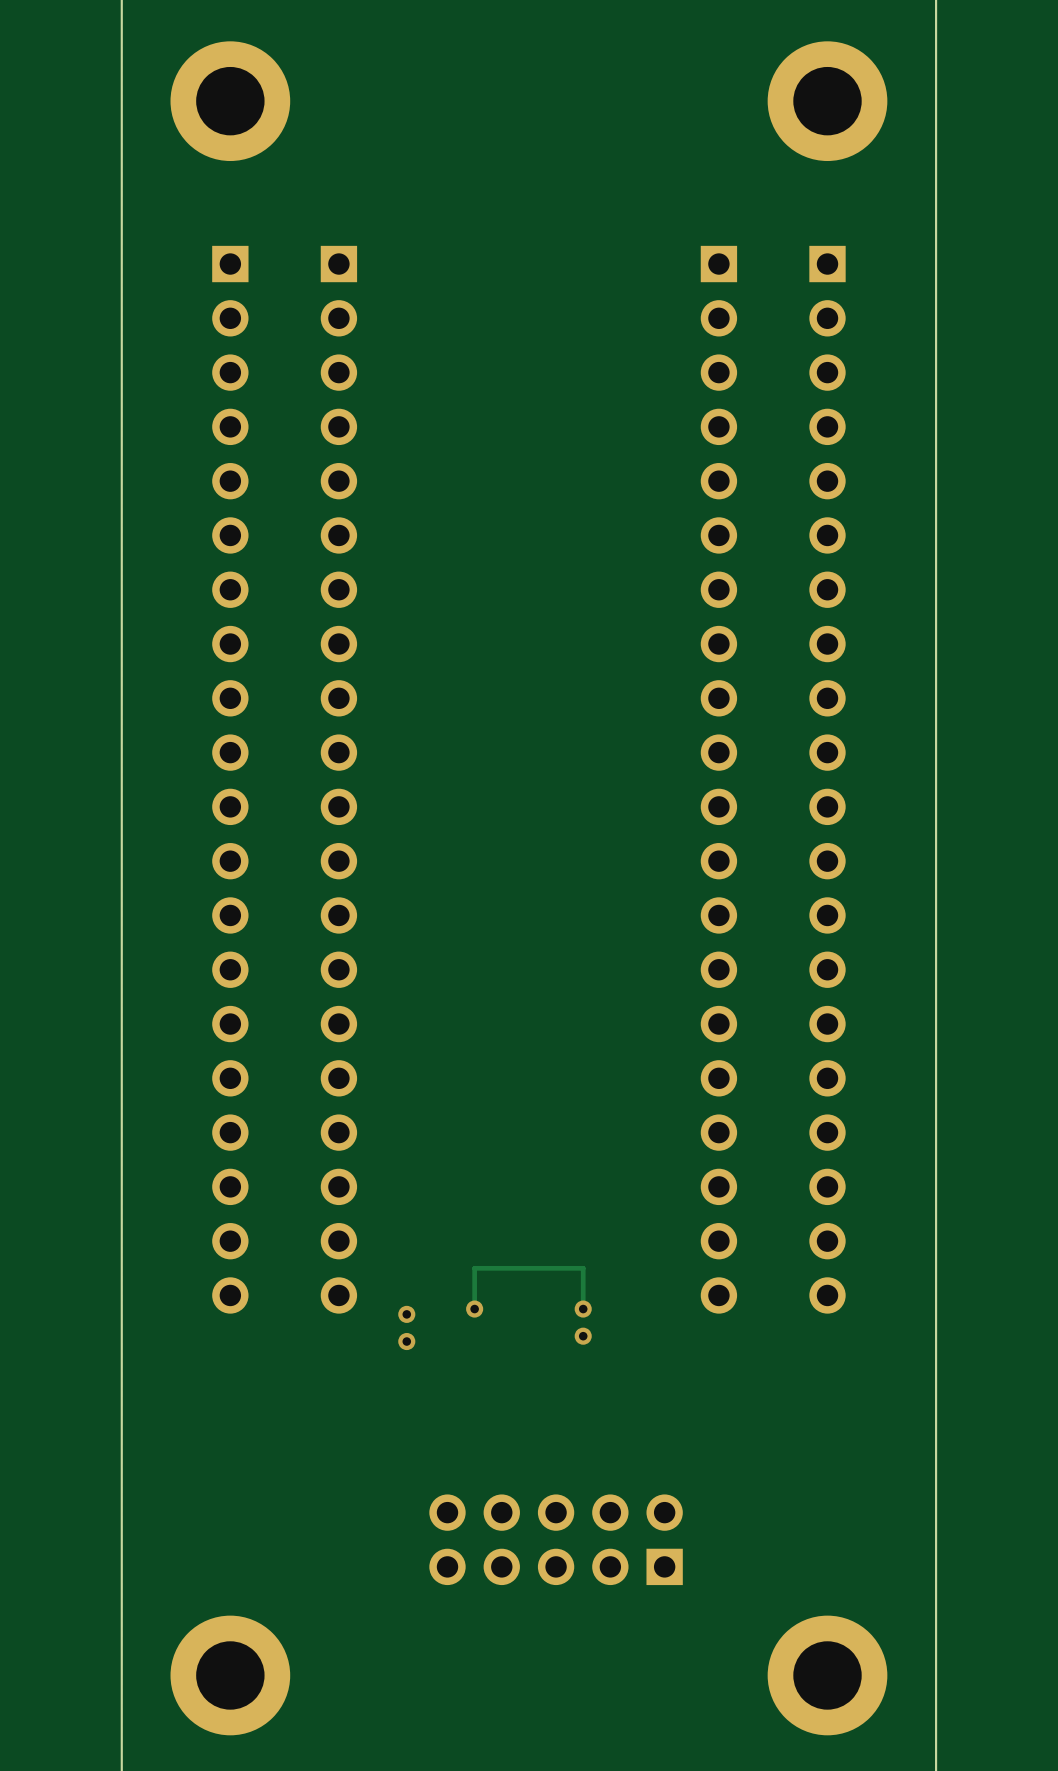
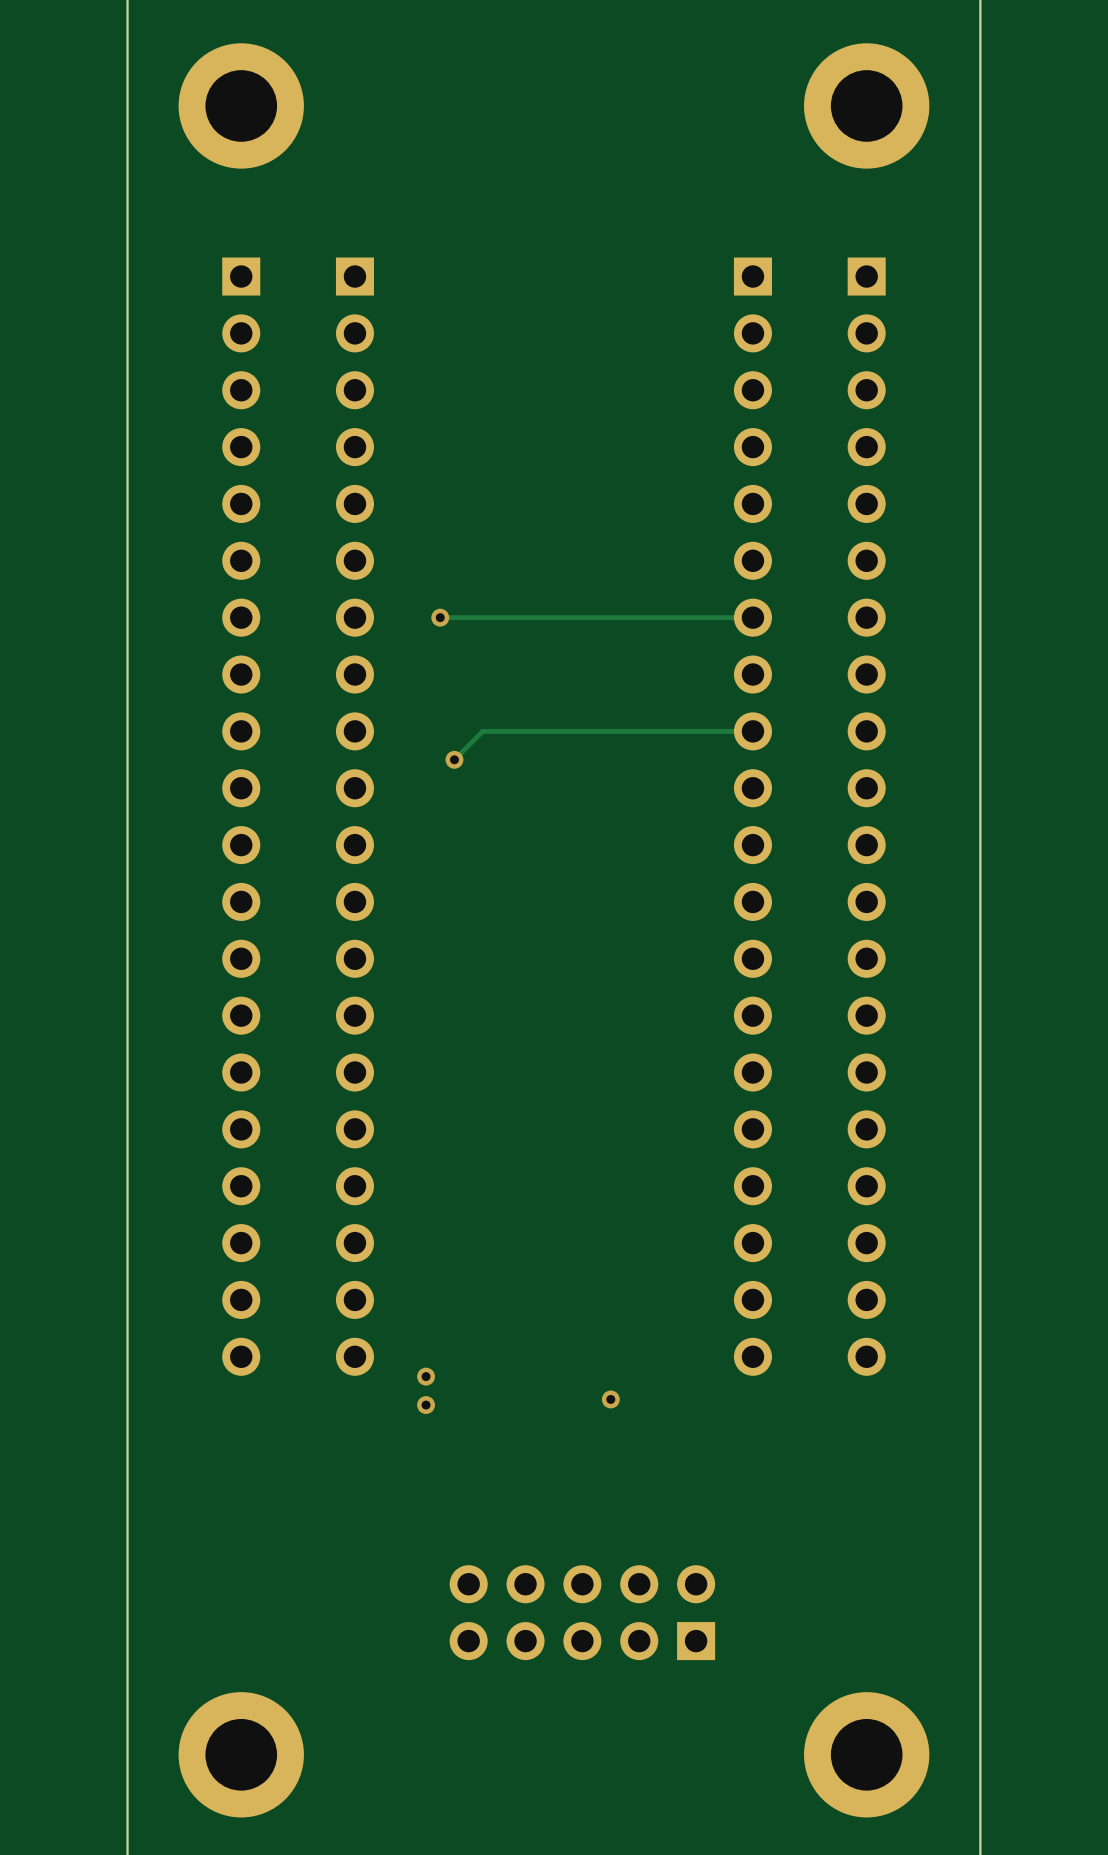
via: none -> (440, 617)
track: none -> (752, 617) (440, 617)
track: none -> (752, 731) (482, 731) (454, 759)
via: none -> (454, 759)
via: (474, 1309) -> none
track: (583, 1309) (583, 1268) (474, 1268) (474, 1309) -> none
via: (583, 1309) -> none

